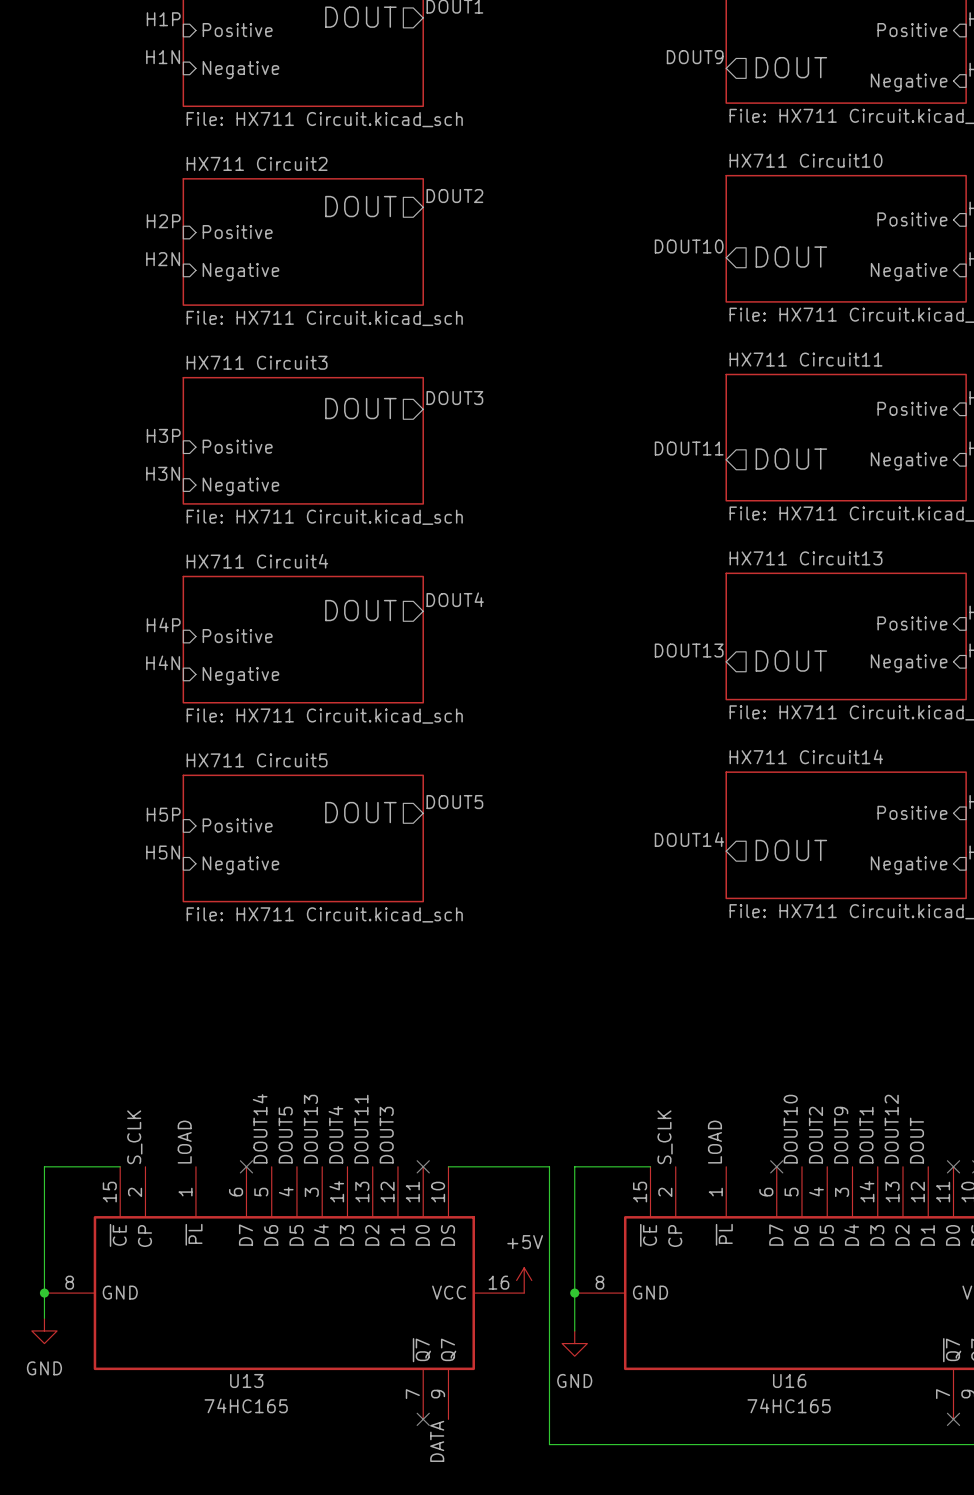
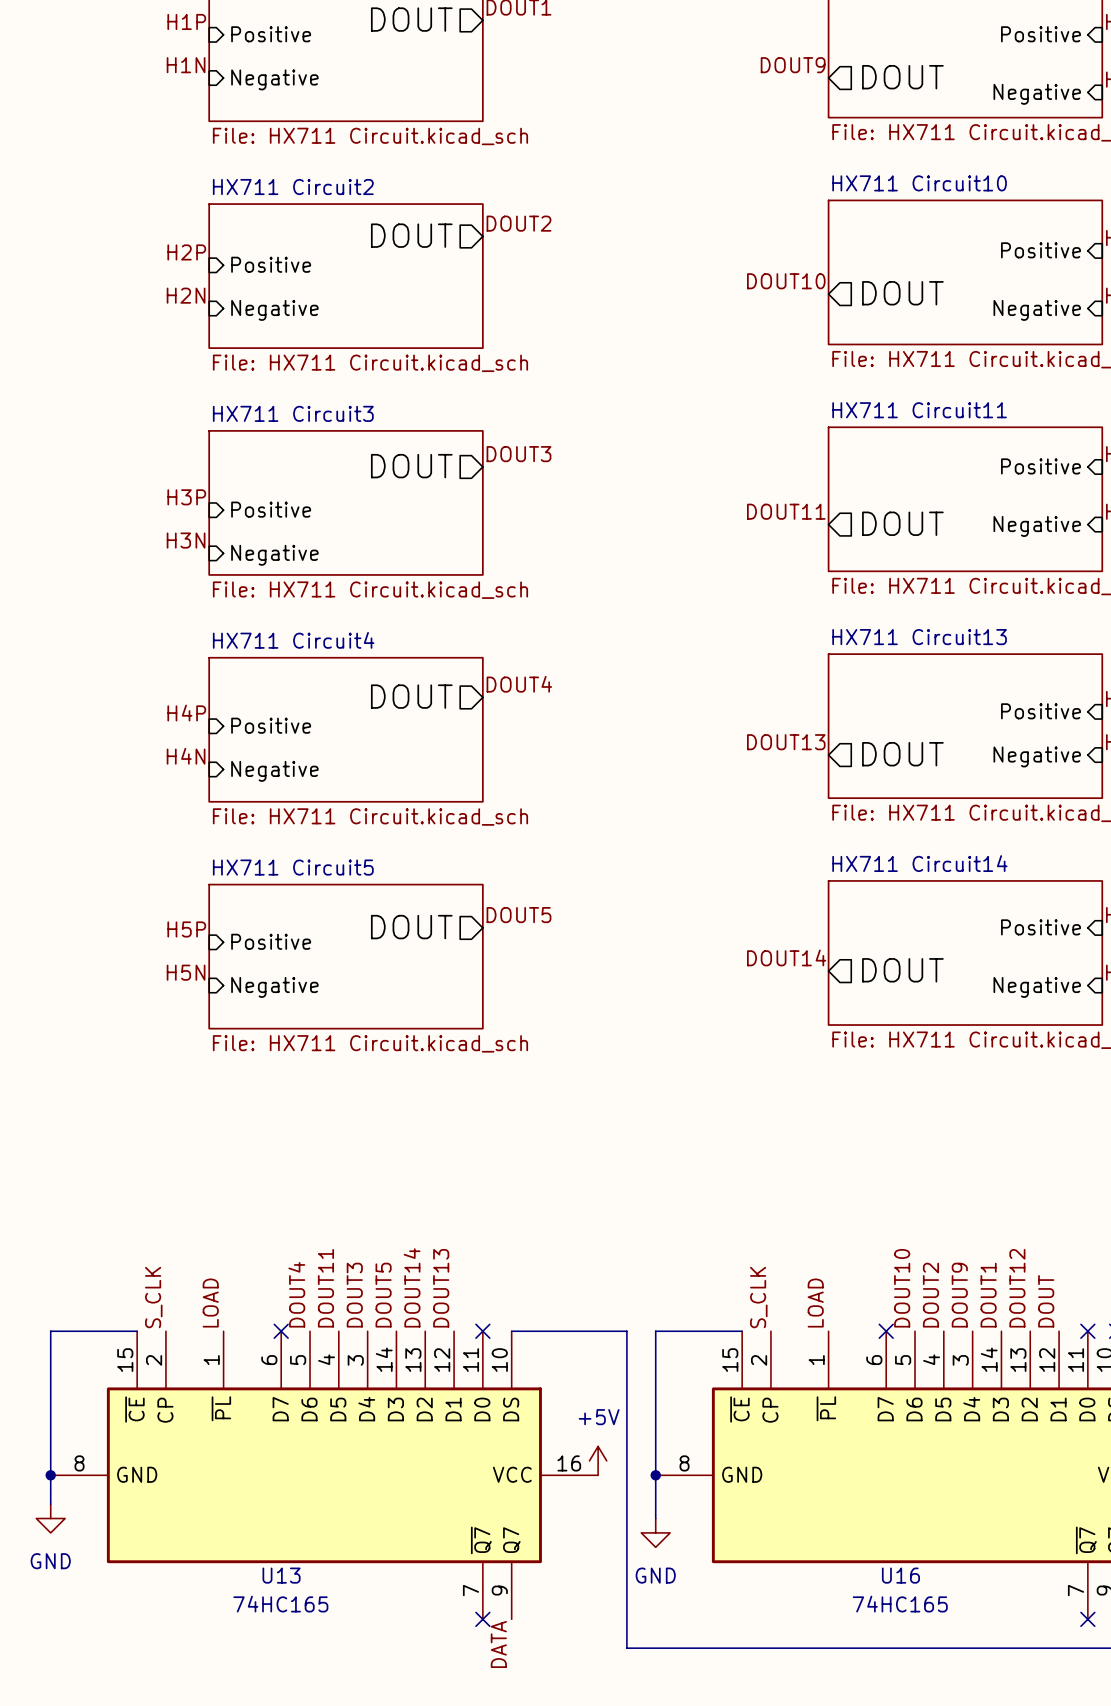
label: DOUT14 (260, 1128) -> DOUT4 (296, 1294)
label: DOUT13 (310, 1129) -> DOUT3 (354, 1295)
label: DOUT11 (361, 1129) -> DOUT14 (412, 1287)
label: DOUT4 (335, 1134) -> DOUT5 (383, 1295)
label: DOUT5 (285, 1135) -> DOUT11 (325, 1288)
label: DOUT3 (386, 1135) -> DOUT13 (441, 1288)

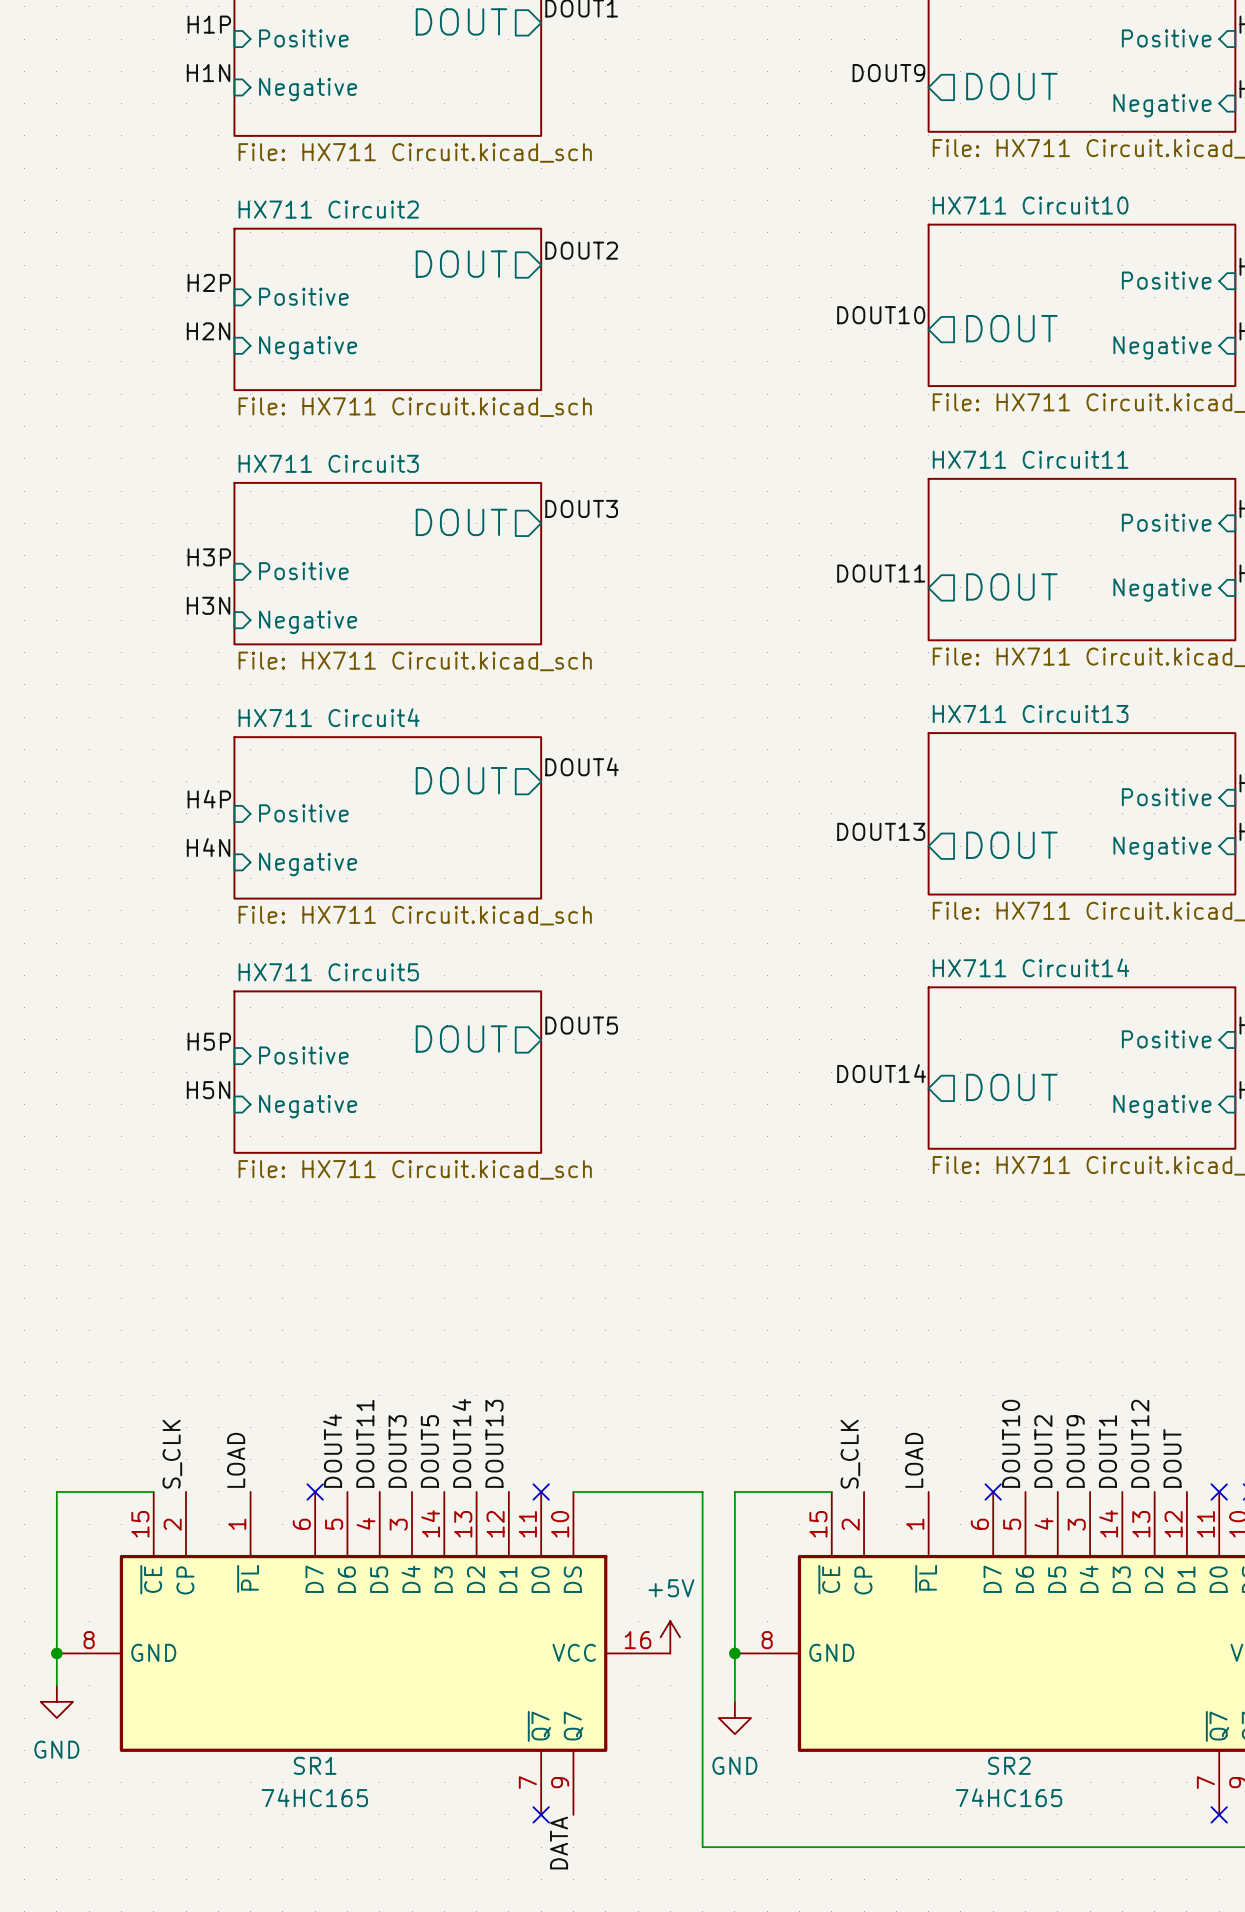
U13 name: U13 (281, 1575) -> SR1 (315, 1765)
U16 name: U16 (900, 1575) -> SR2 (1009, 1765)

